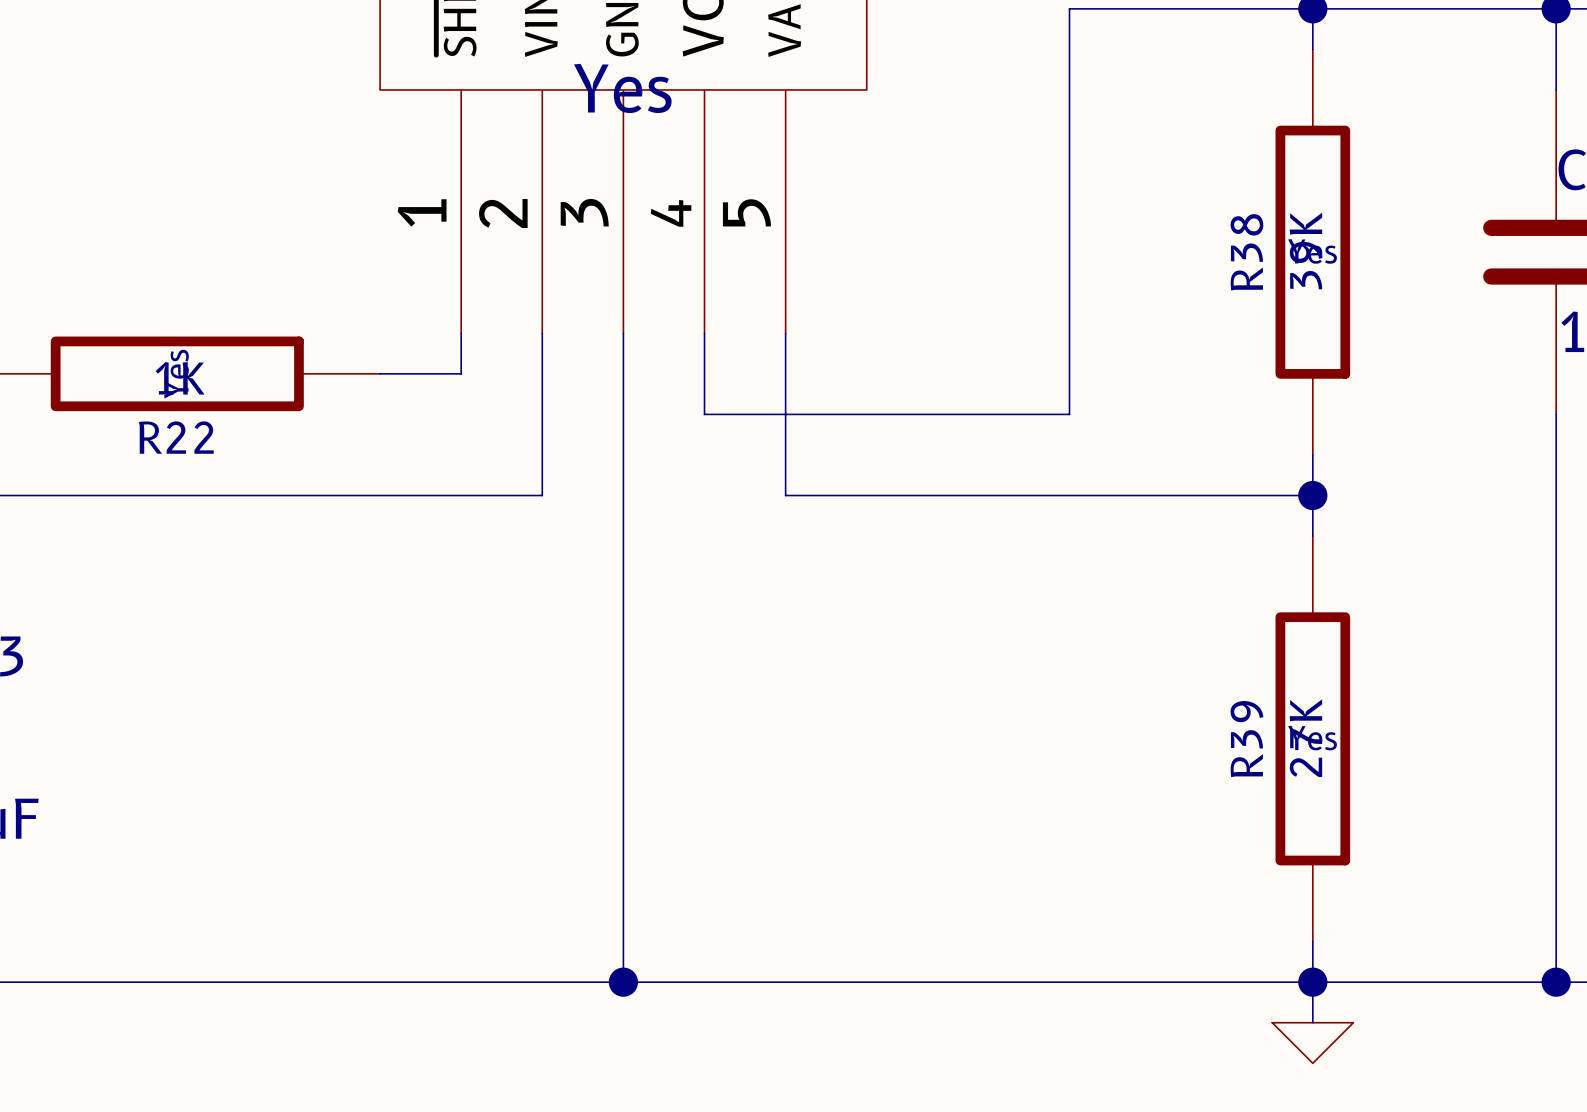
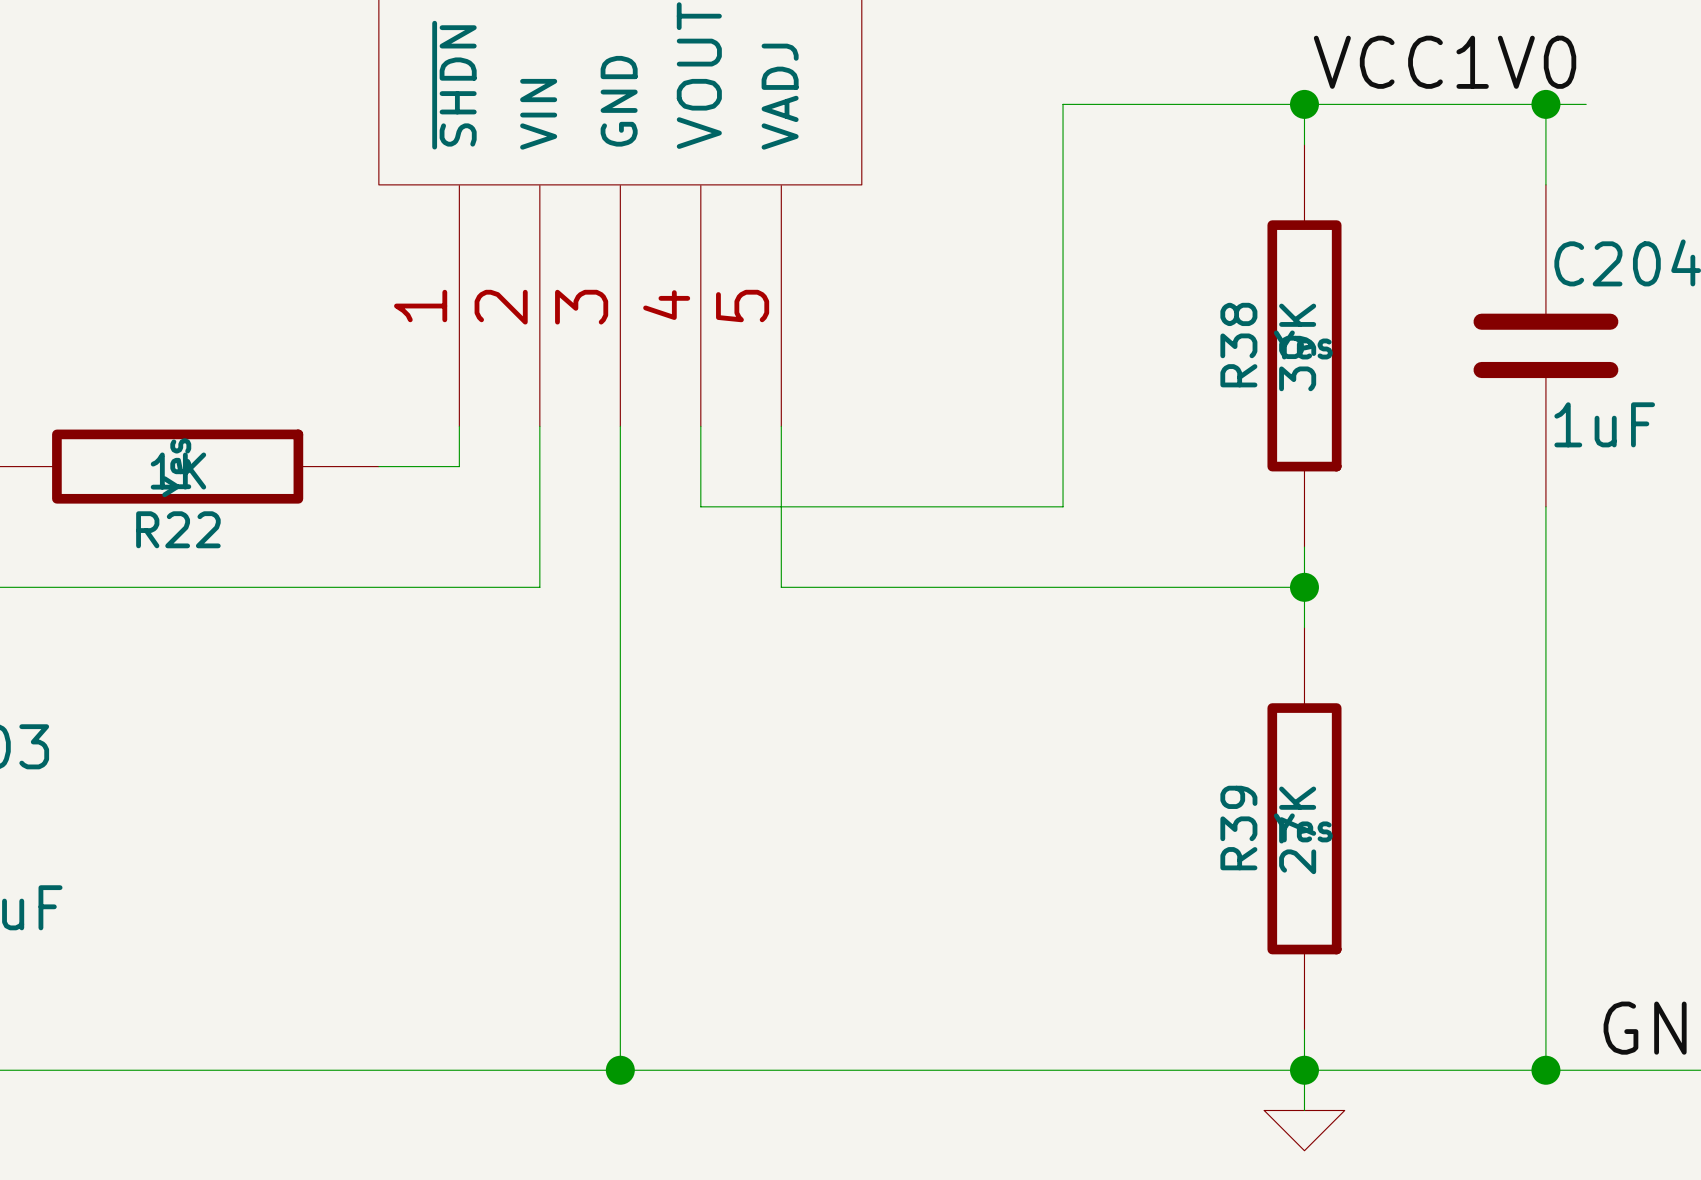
part text: Yes (622, 88) -> none

